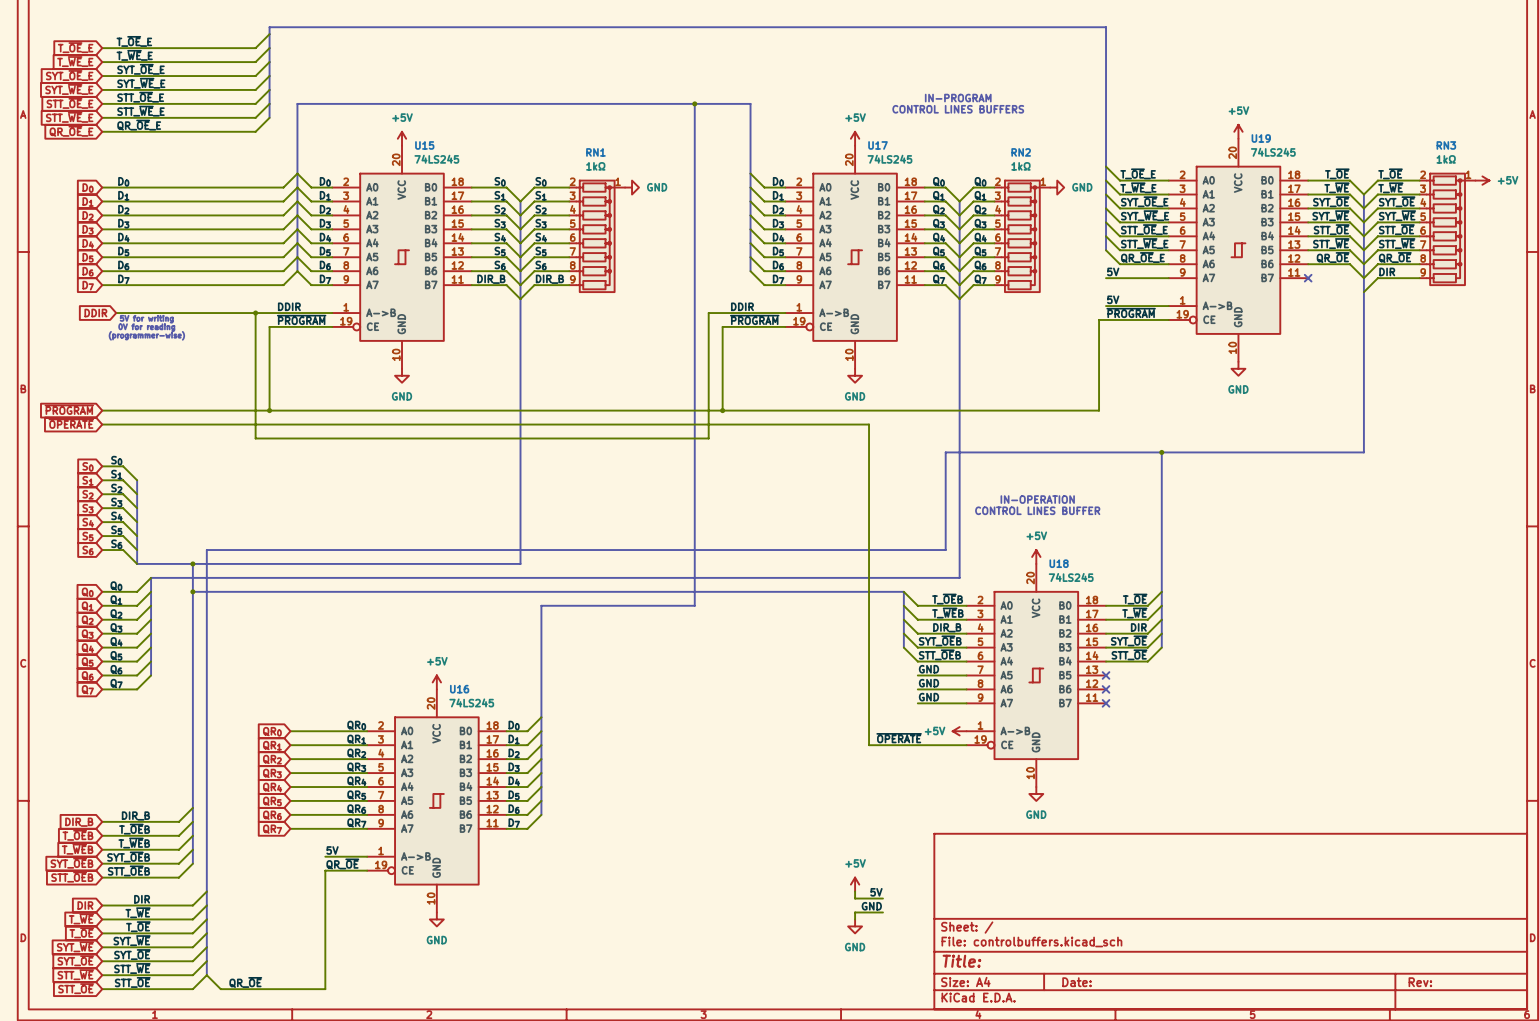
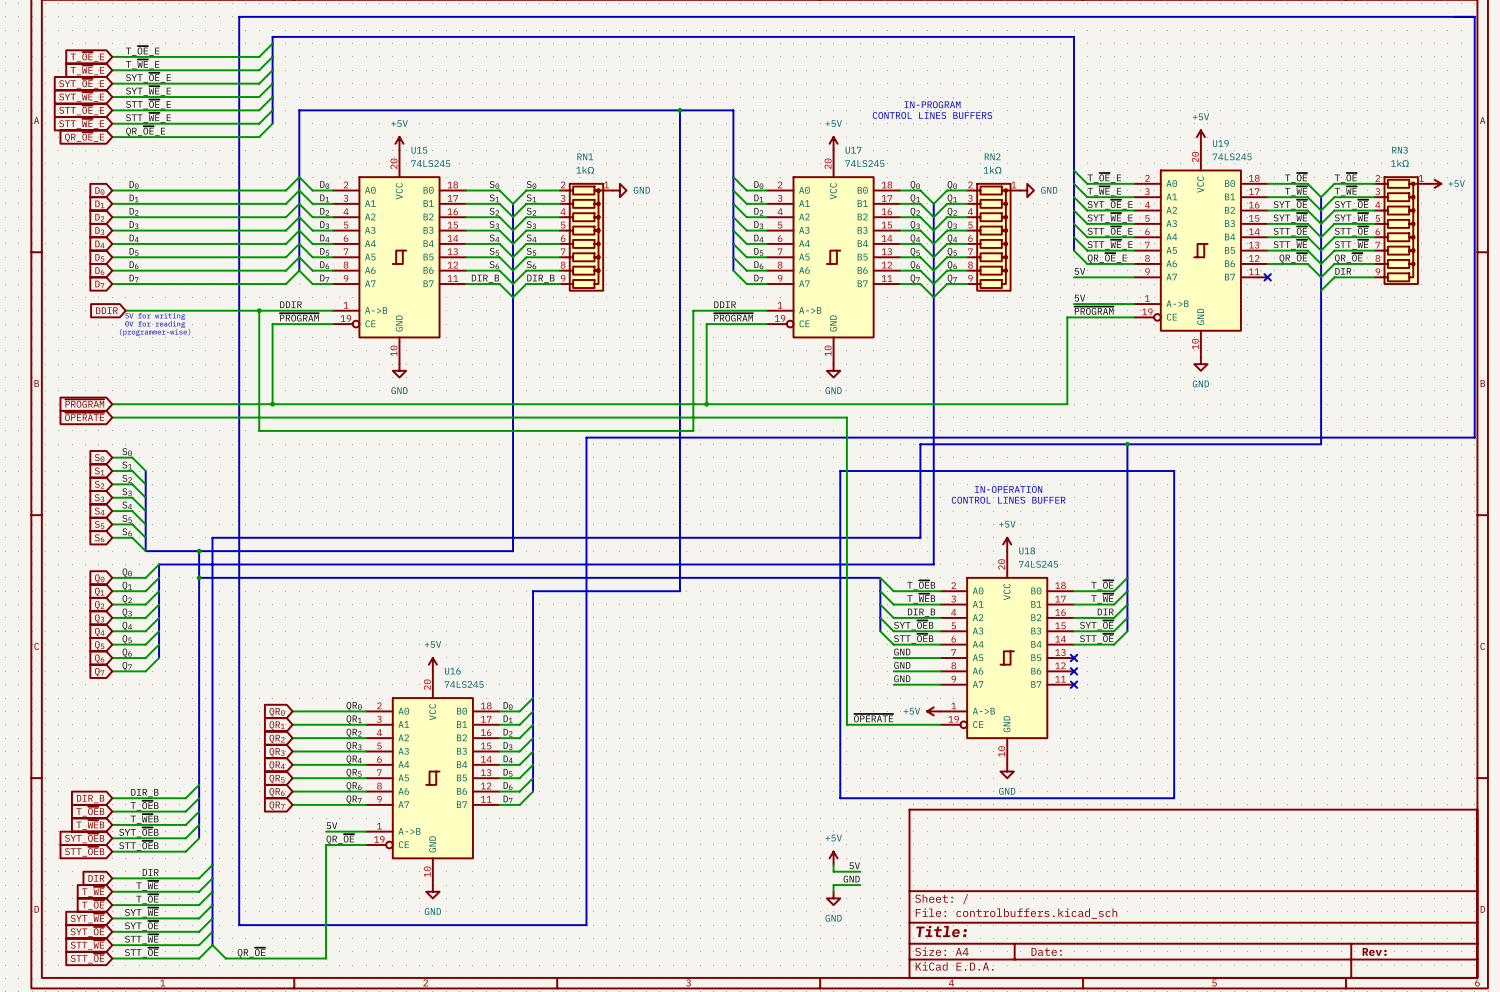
line: none -> (239, 16) (1474, 16) (1474, 437) (586, 437) (586, 925) (239, 925) (239, 16)
line: none -> (840, 471) (1174, 471) (1174, 798) (840, 798) (840, 471)

